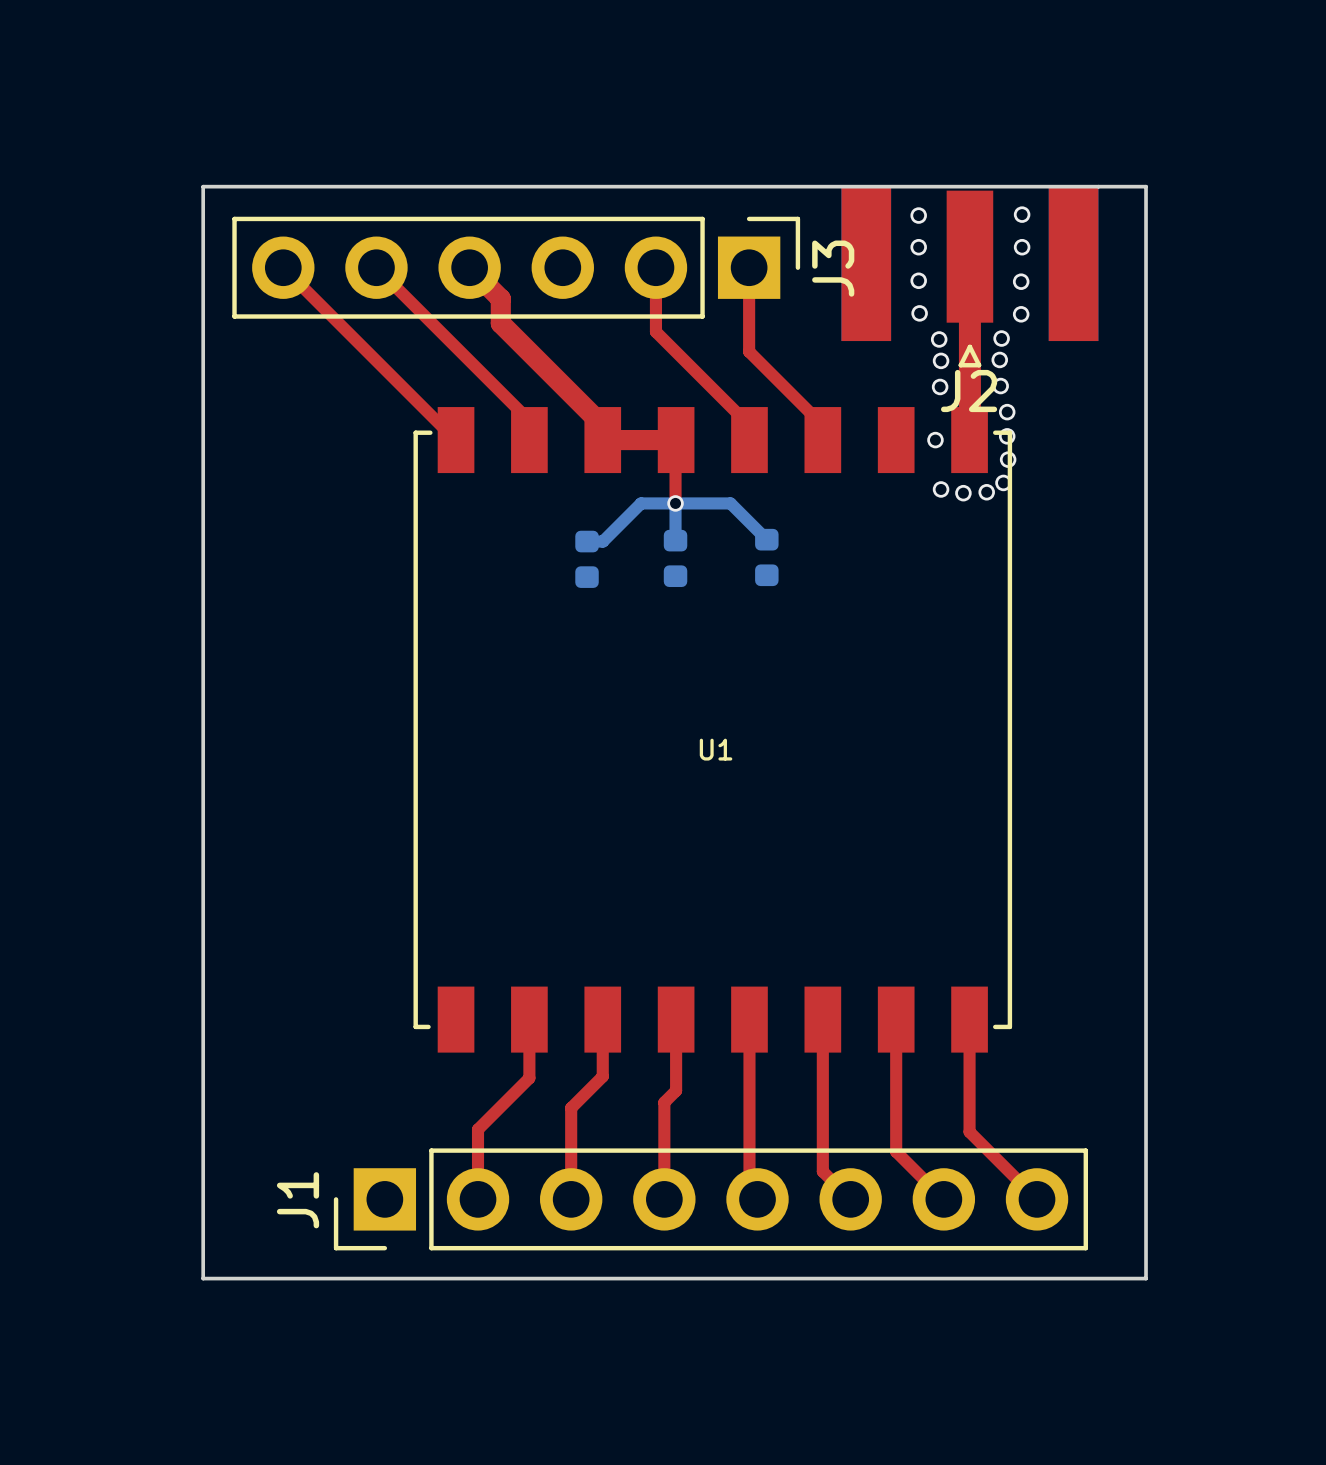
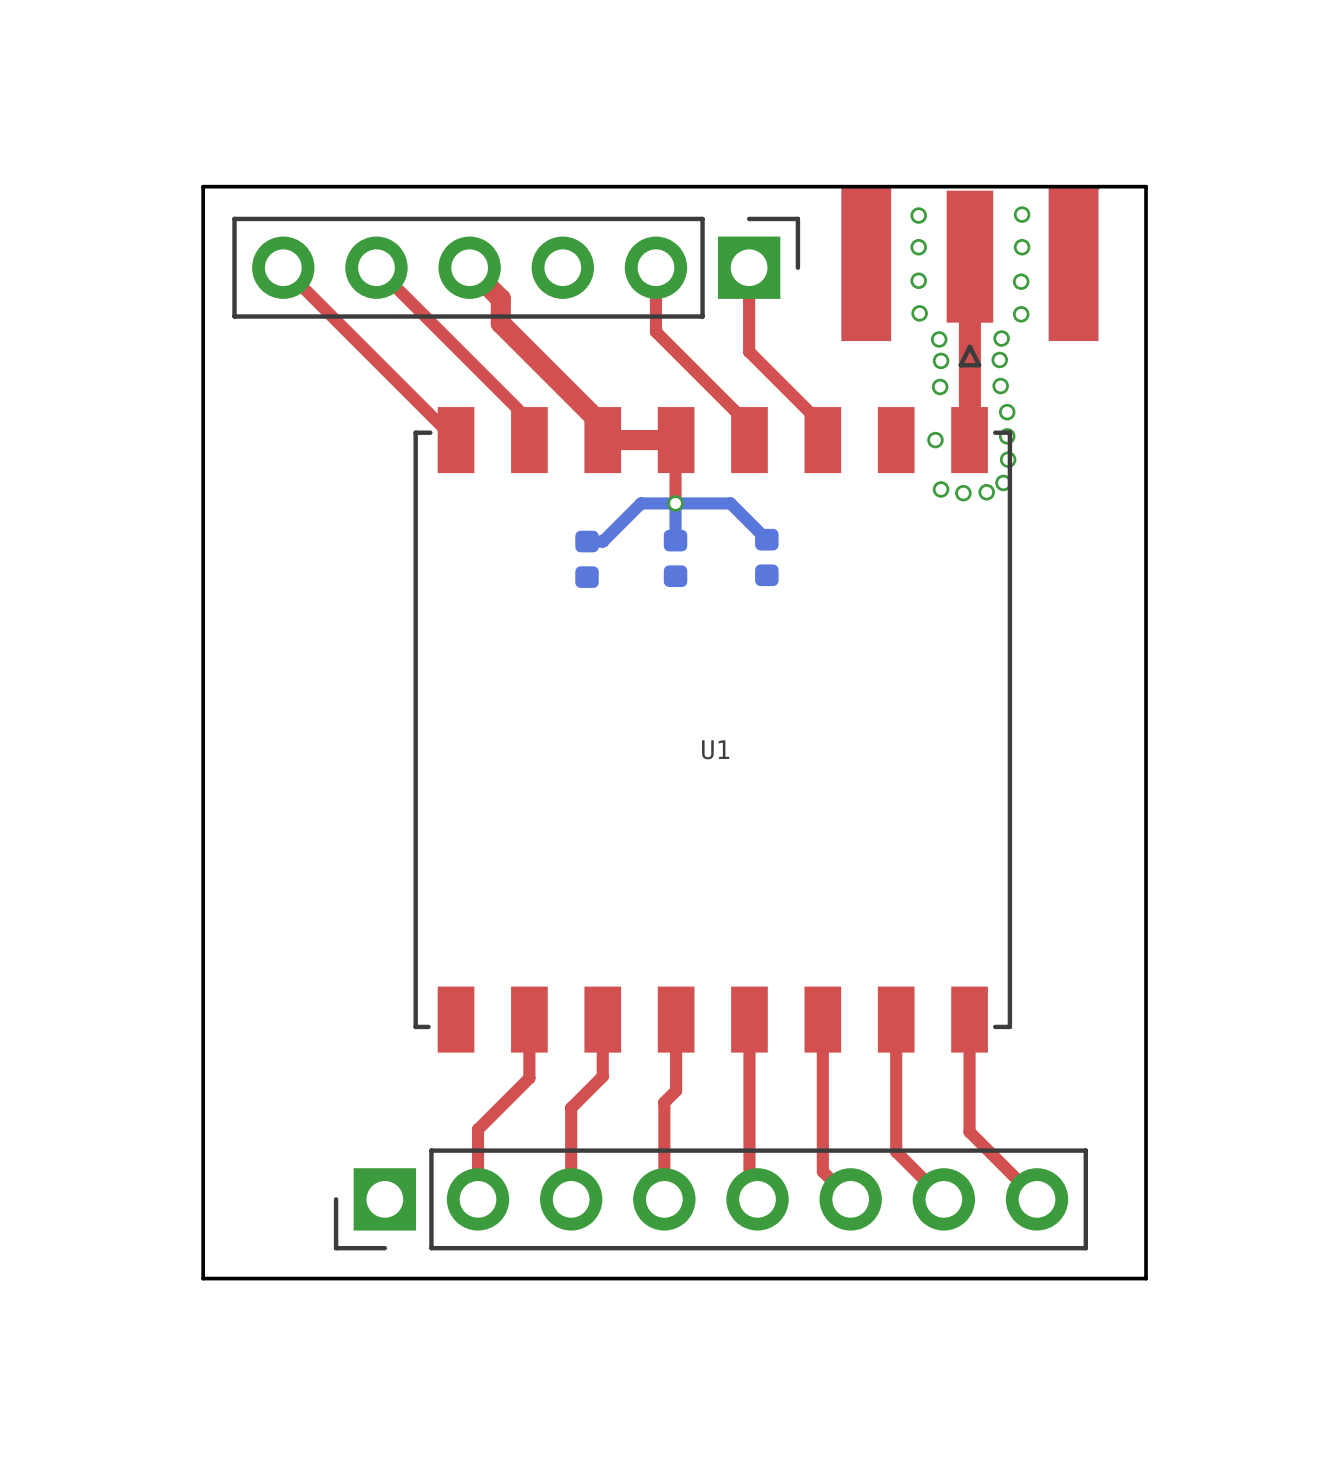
J3 name: J3 (833, 268) -> none
J2 name: J2 (969, 391) -> none
J1 name: J1 (298, 1200) -> none

